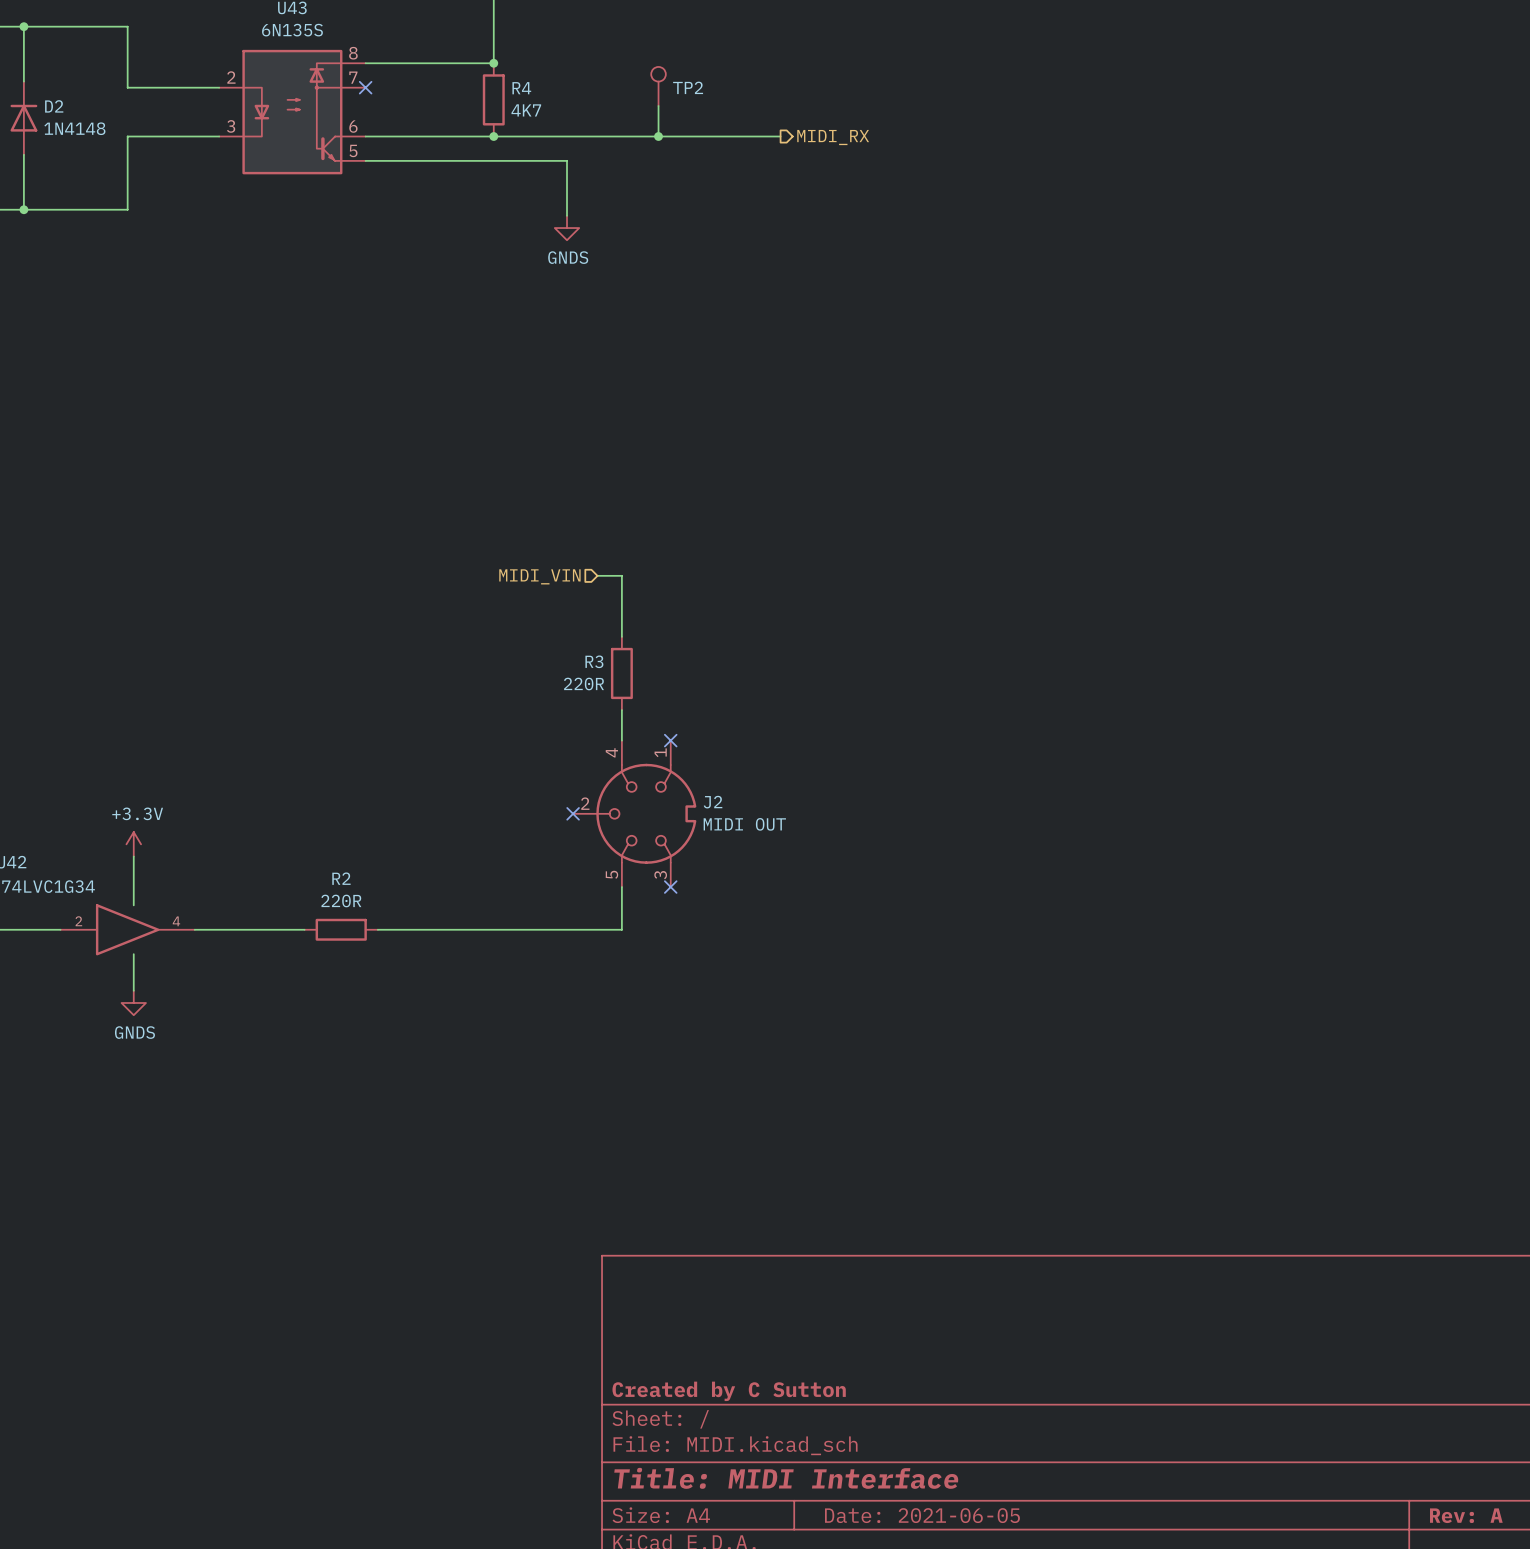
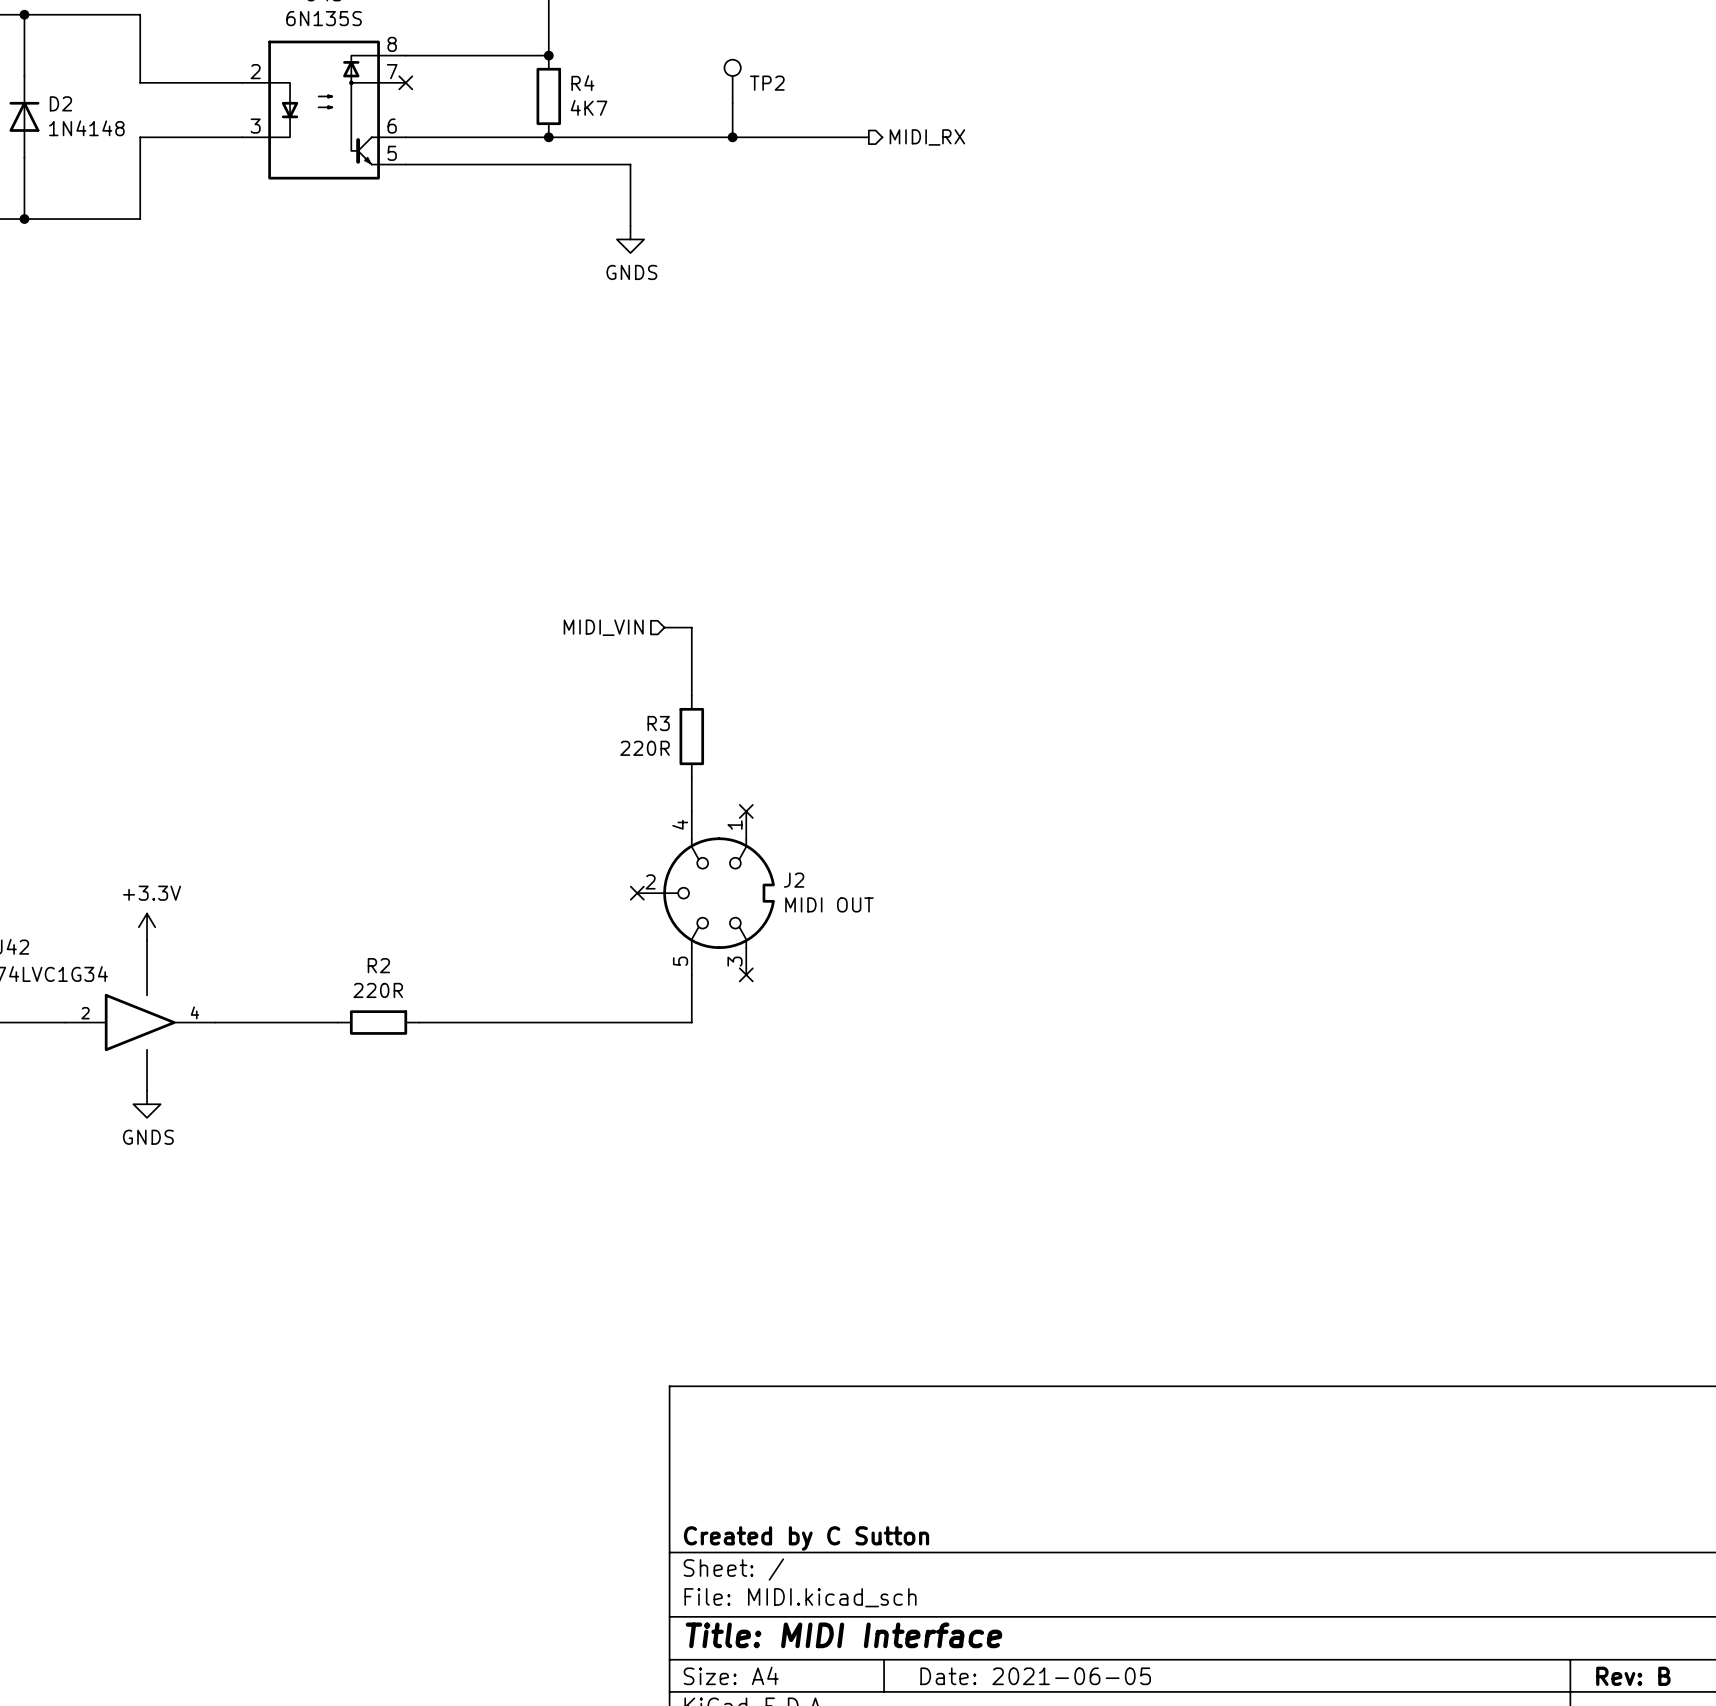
title block: Rev: A (1466, 1515) -> Rev: B (1633, 1676)

